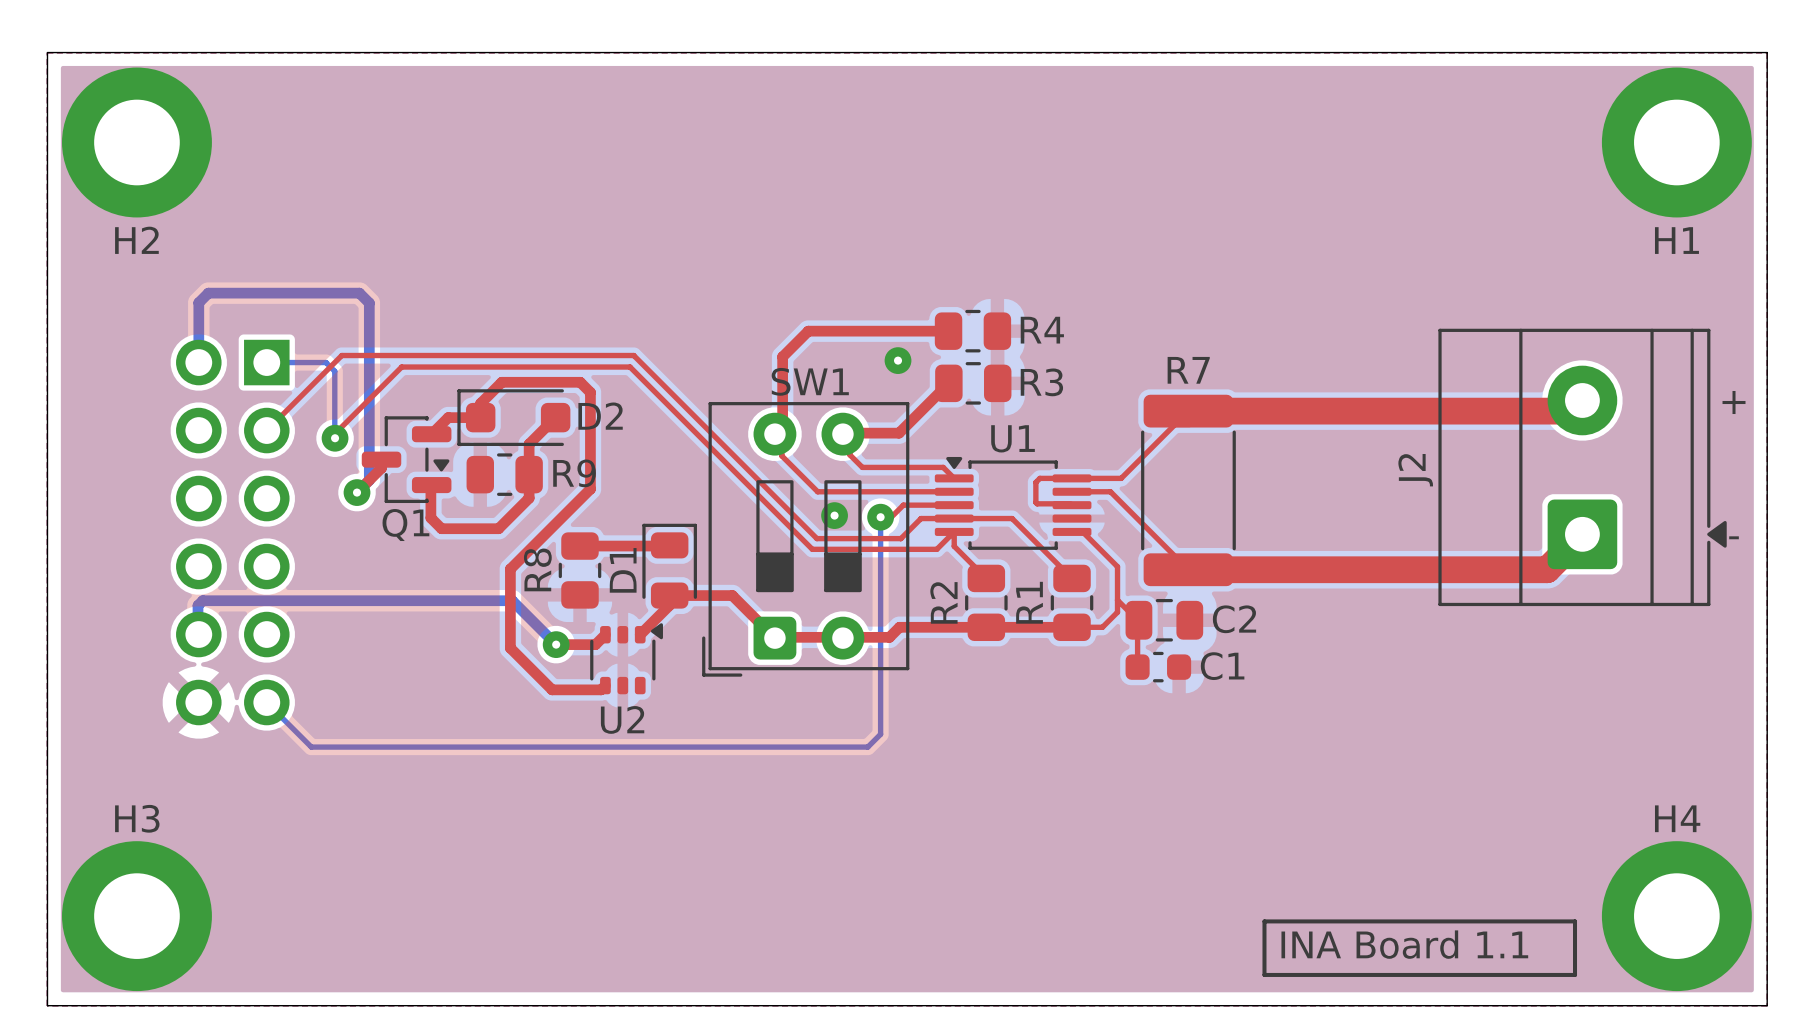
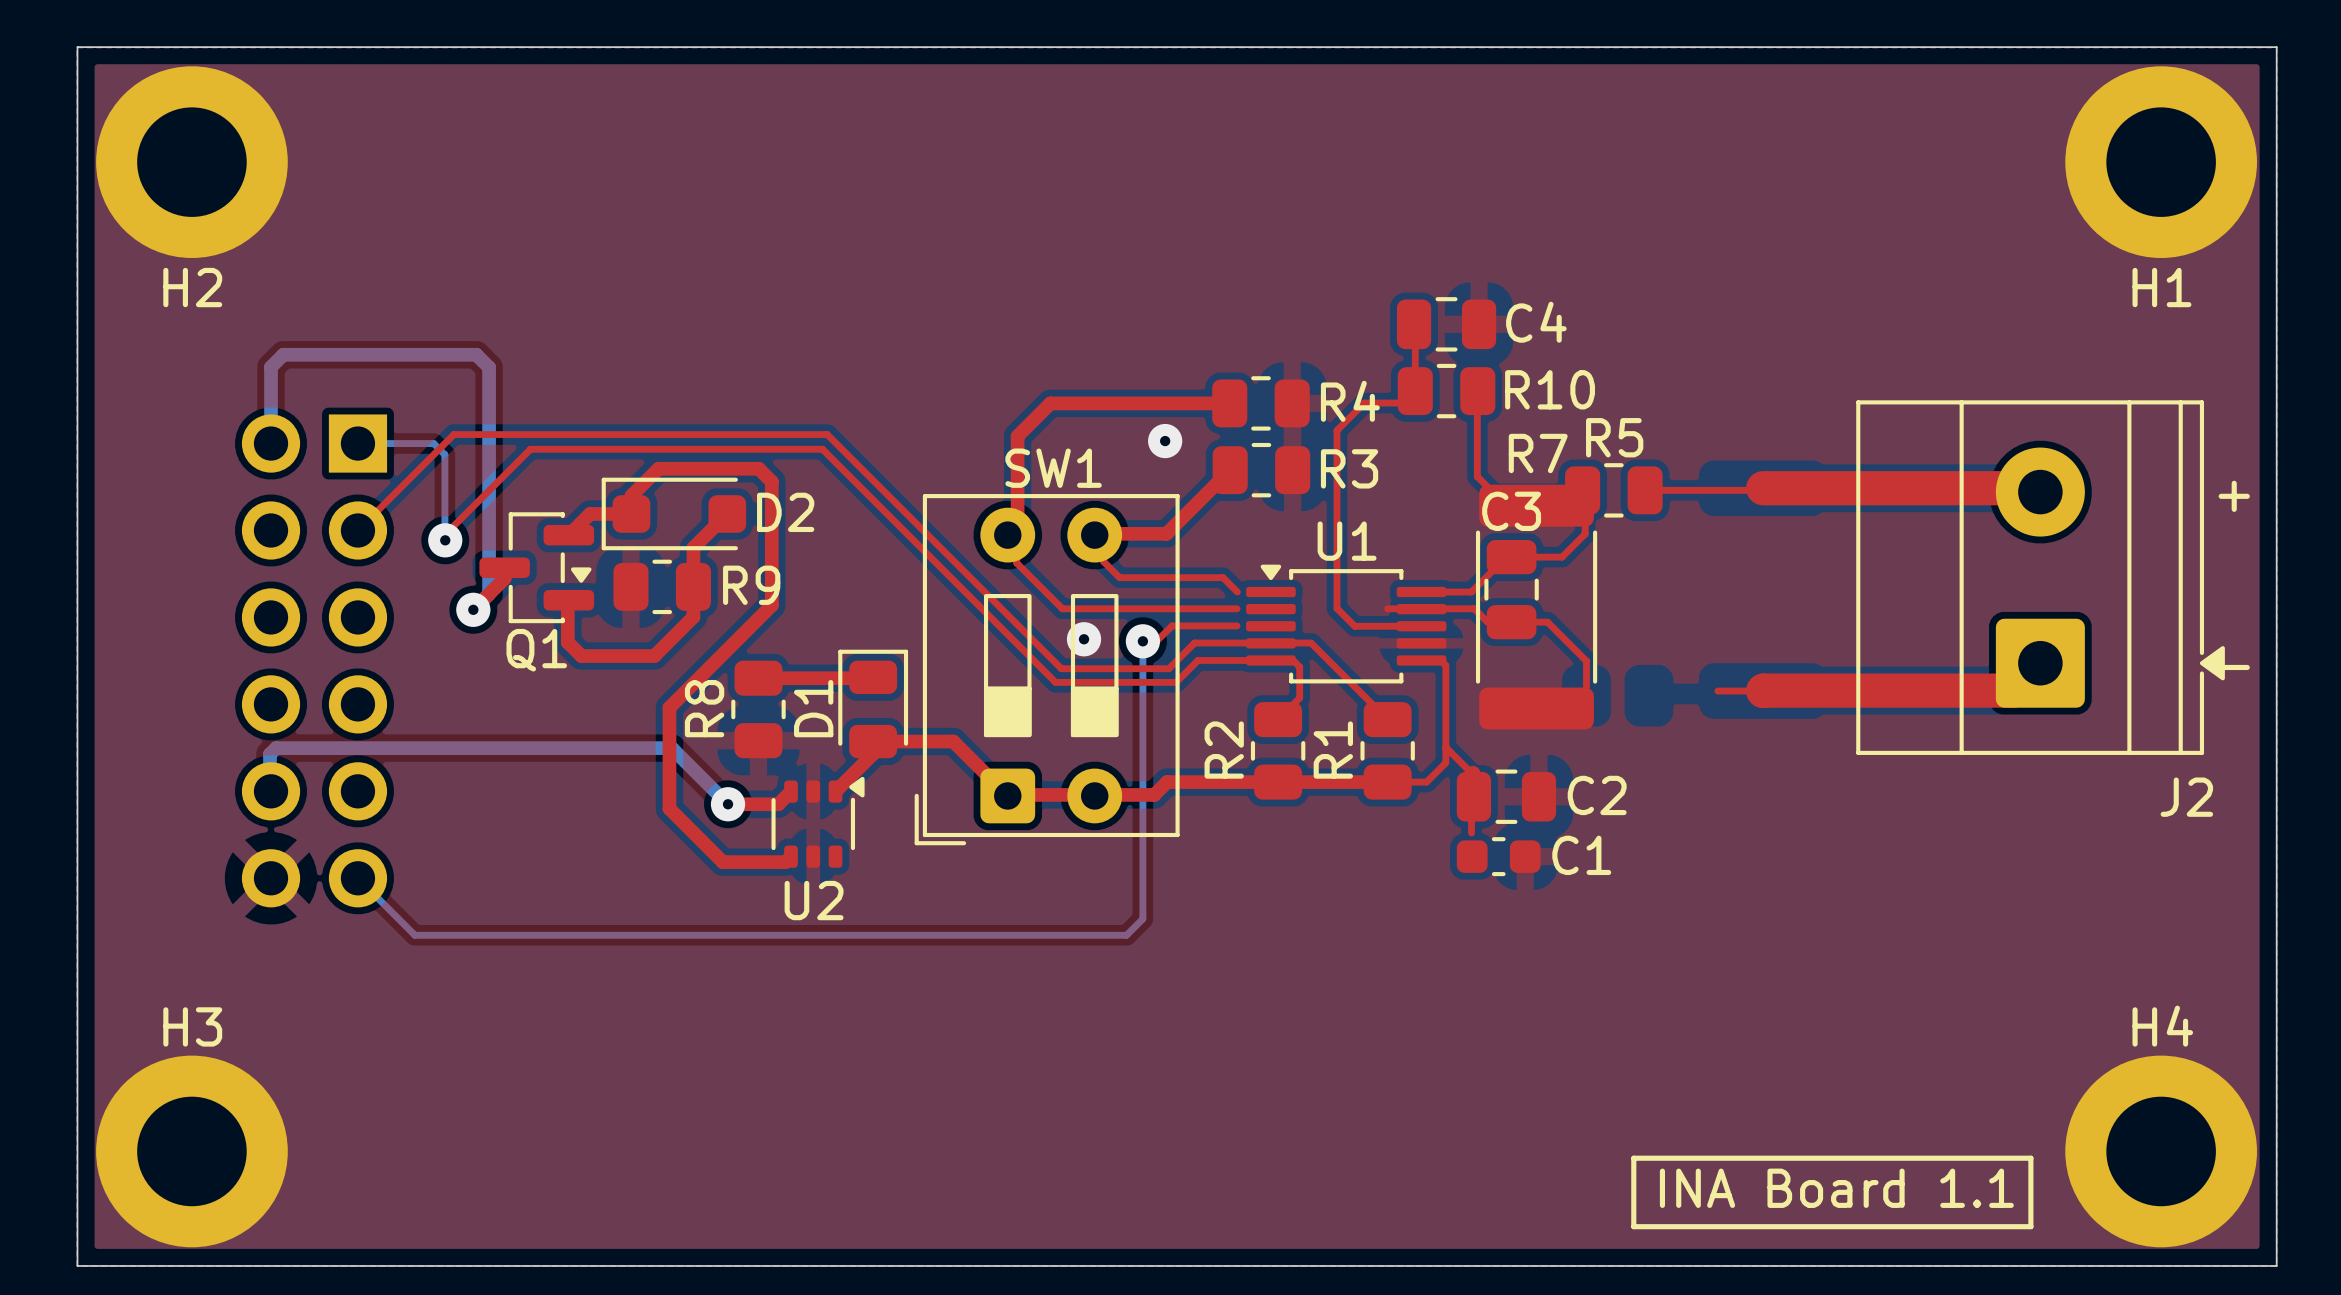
C4: none -> (1446, 324)
top track: none -> (1414, 334) (1415, 403) (1364, 403) (1337, 430) (1337, 608) (1354, 626) (1421, 626)
R10: none -> (1446, 391)
top track: none -> (1477, 391) (1477, 476) (1494, 493) (1579, 493) (1582, 490) (1585, 492) (1585, 534) (1562, 557) (1506, 557) (1471, 592) (1421, 592)
R5: none -> (1613, 490)
top track: (1188, 411) (1589, 411) -> (1645, 490) (2031, 488) (2049, 505)
top track: (1189, 424) (1175, 424) (1121, 478) (1039, 478) (1035, 482) (1037, 503) (1070, 503) -> none
J2 name rotation: 0° (1415, 470) -> 90° clockwise (2186, 797)
J2 name position: J2 (1415, 470) -> J2 (2186, 797)
C3: none -> (1511, 589)
top track: (1110, 491) (1189, 571) -> (1436, 608) (1474, 608) (1487, 622) (1547, 622) (1586, 661) (1586, 686)
U1 position: (1013, 503) -> (1346, 624)
top track: (1072, 531) (1082, 531) (1117, 566) -> (1421, 660) (1440, 660) (1445, 665) (1445, 704)
top track: (906, 549) (936, 549) (954, 531) (954, 546) (986, 578) -> (1176, 682) (1198, 660) (1293, 660) (1299, 666) (1299, 698) (1278, 719)
top track: (1561, 555) (1547, 569) (1188, 569) -> (2013, 690) (1763, 690)
top track: none -> (1717, 691) (1763, 691)
C2 position: (1164, 620) -> (1506, 796)
C1 position: (1158, 667) -> (1498, 856)

